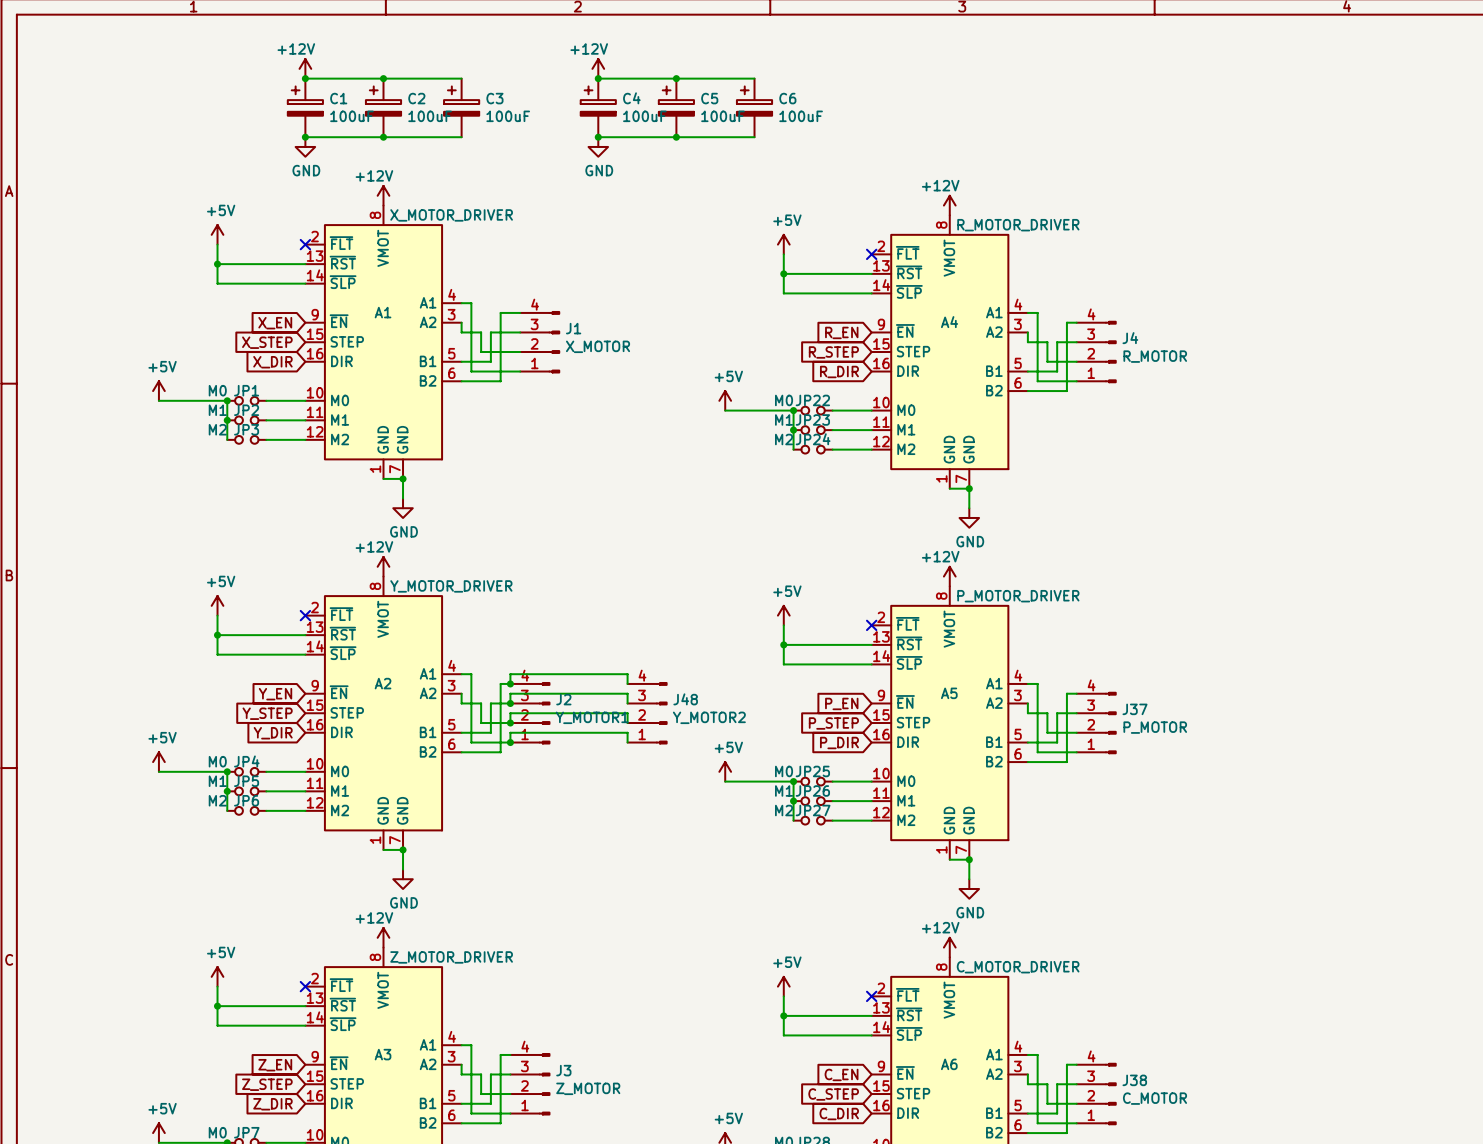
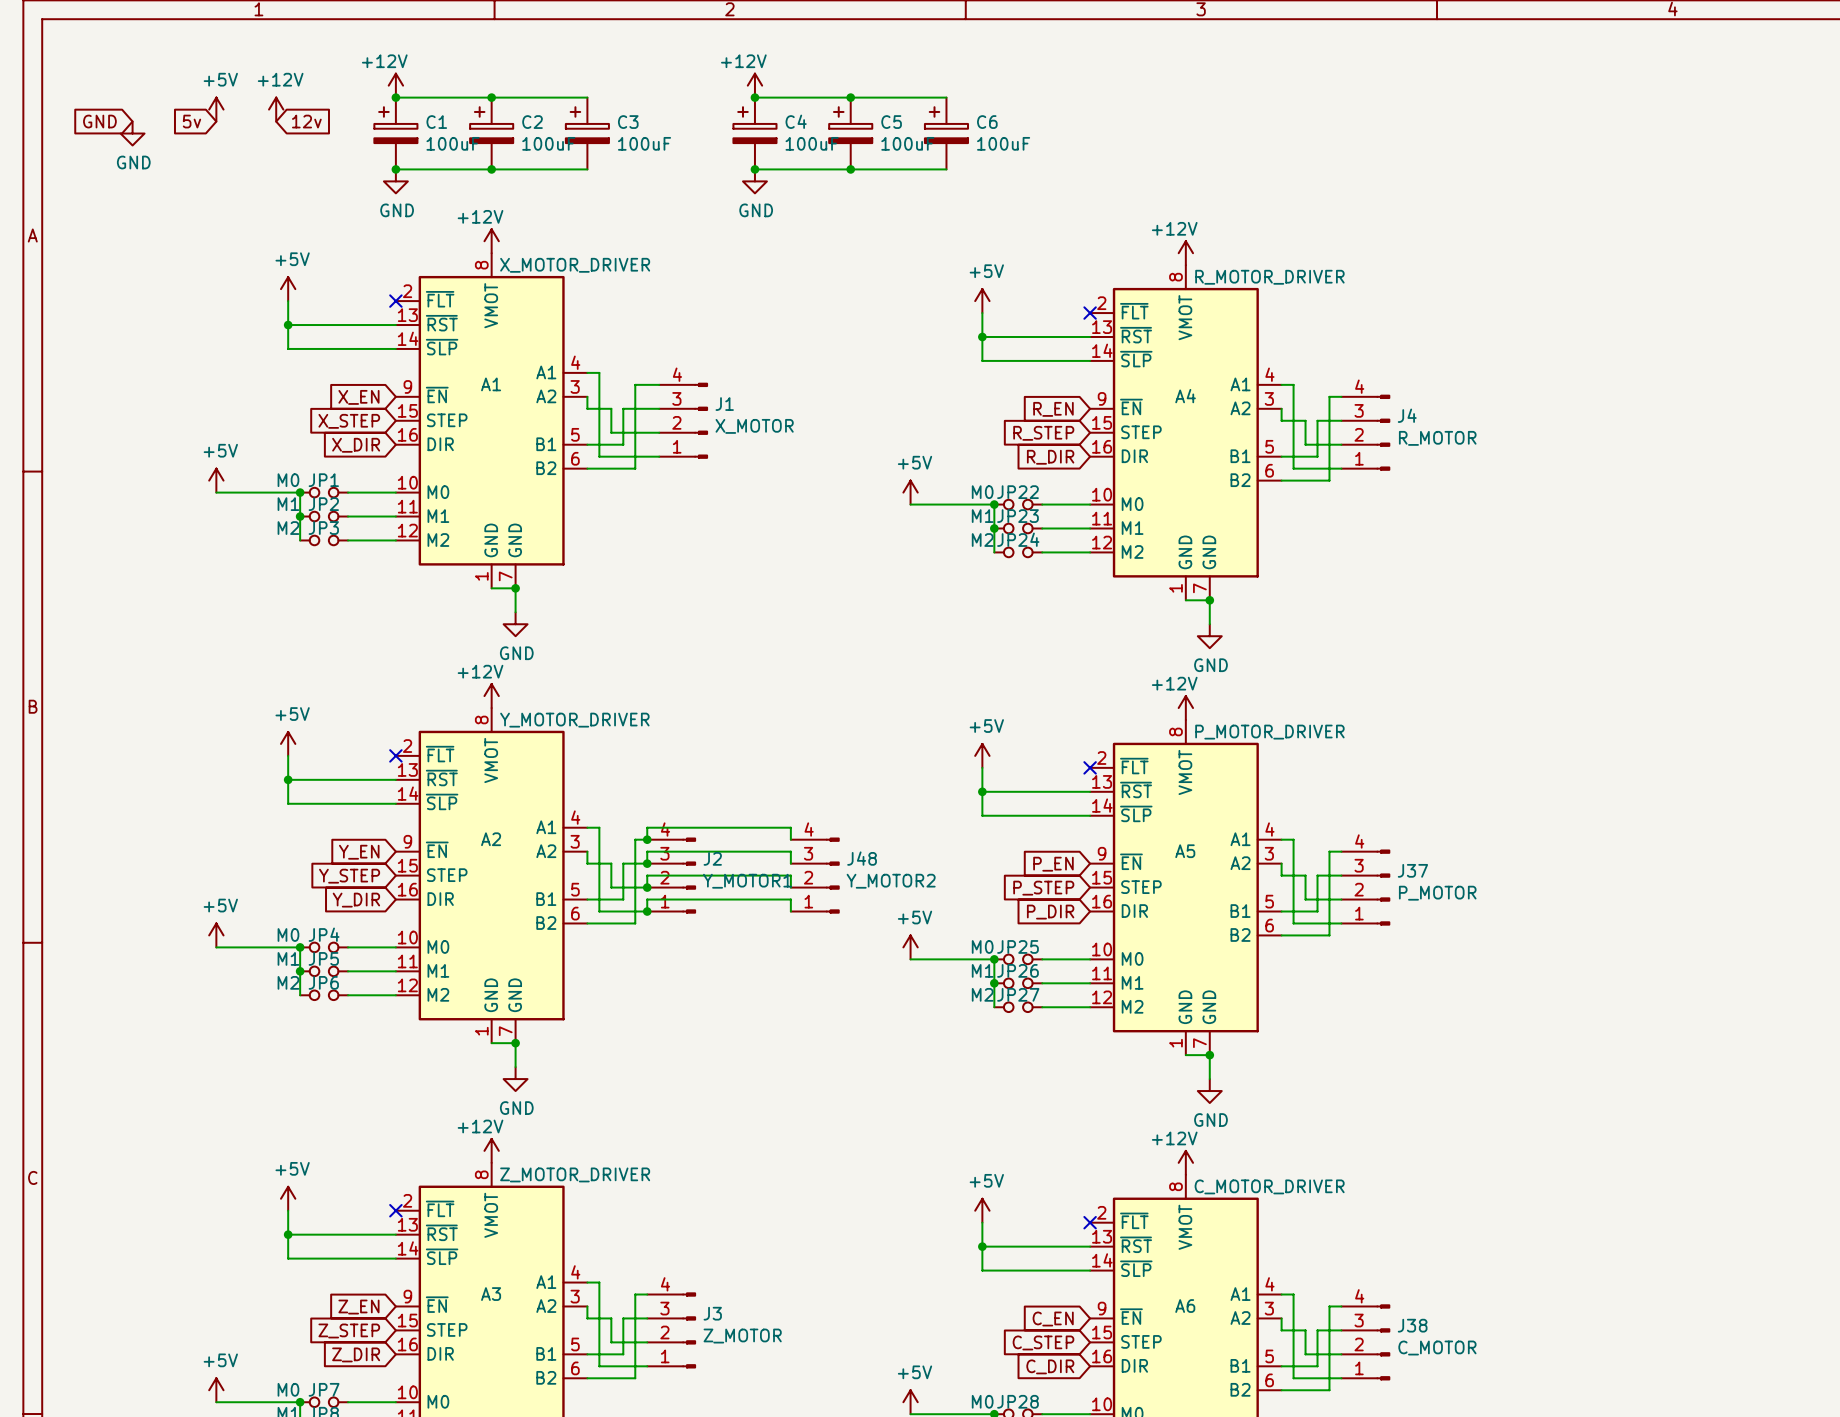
power symbol: none -> +5V (216, 109)
power symbol: none -> +12V (276, 109)
global label: none -> GND (99, 121)
global label: none -> 5v (191, 121)
global label: none -> 12v (306, 121)
power symbol: none -> GND (132, 133)

